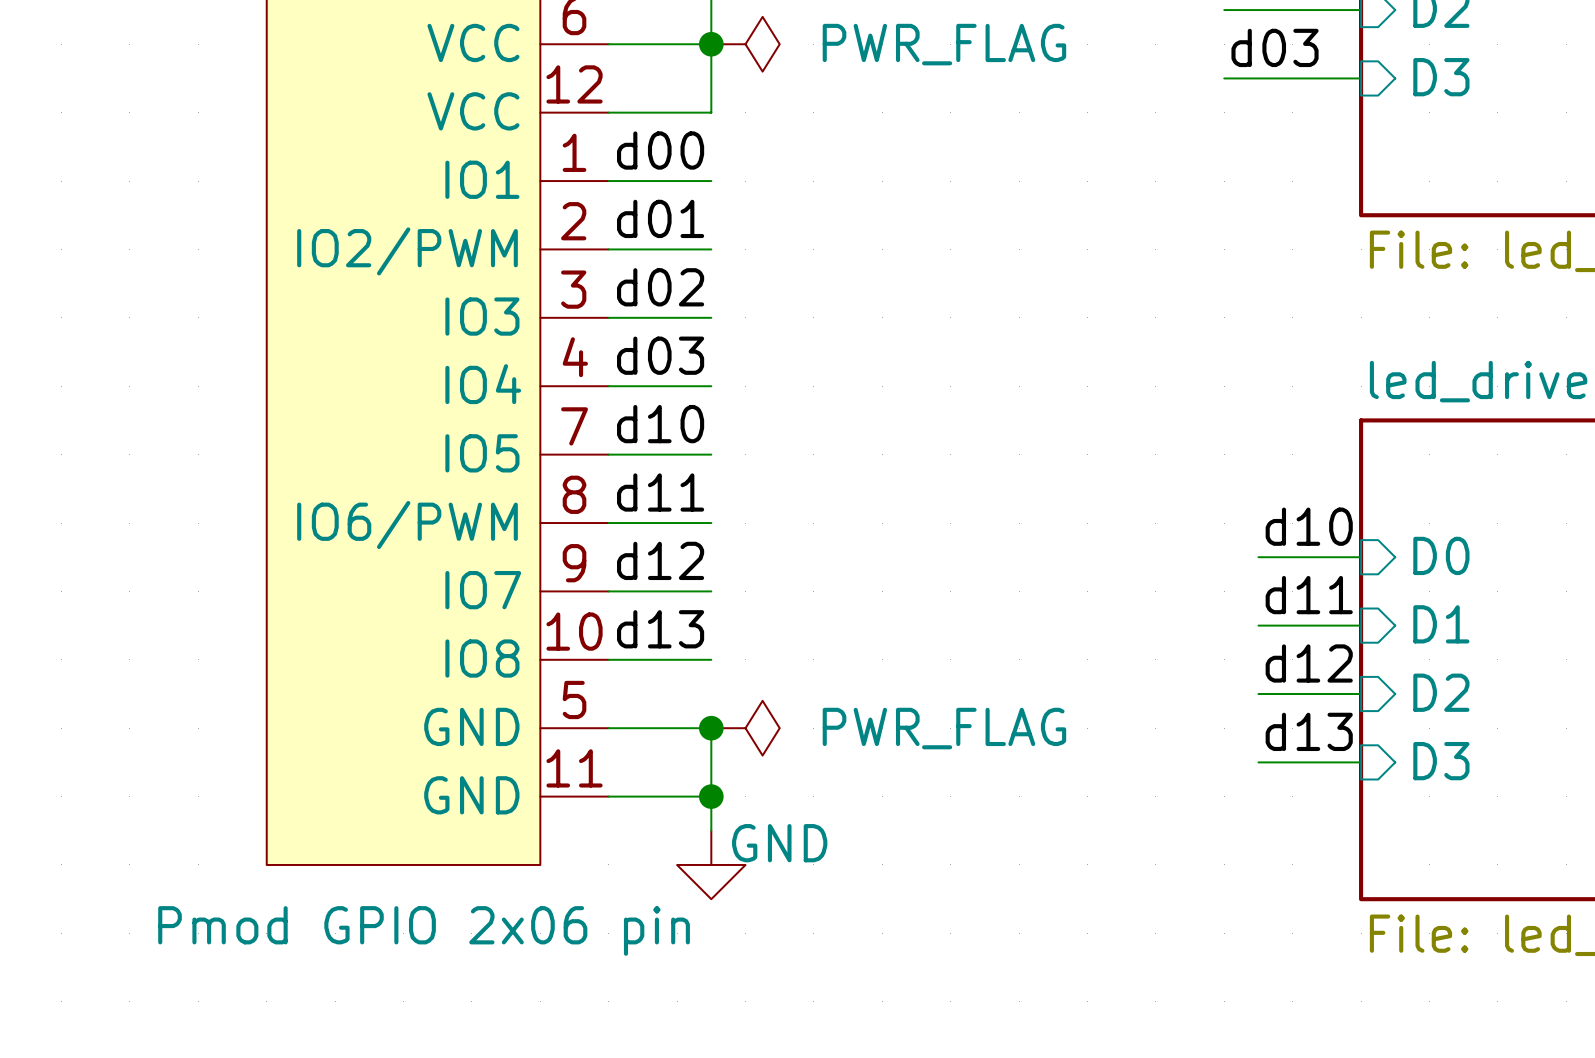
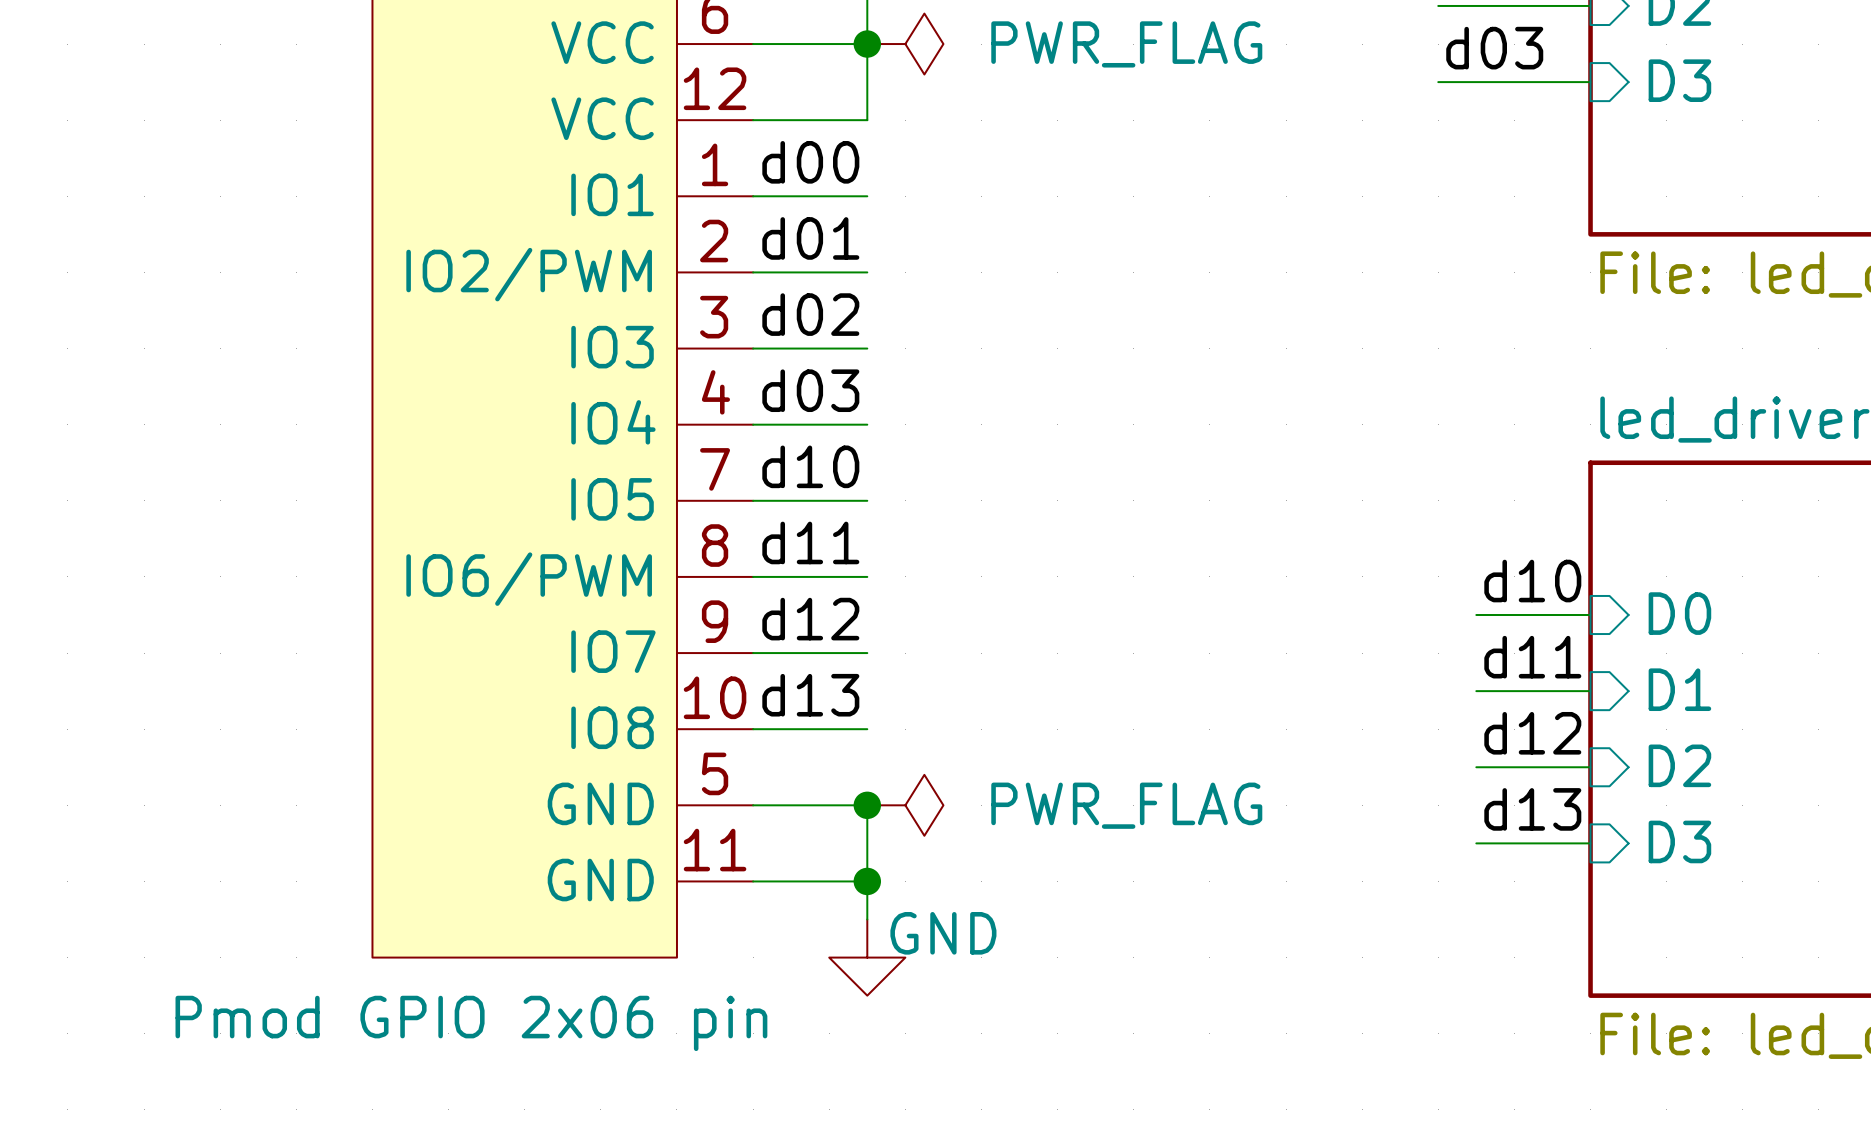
part value position: Pmod GPIO 2x06 pin (424, 930) -> Pmod GPIO 2x06 pin (471, 1023)

